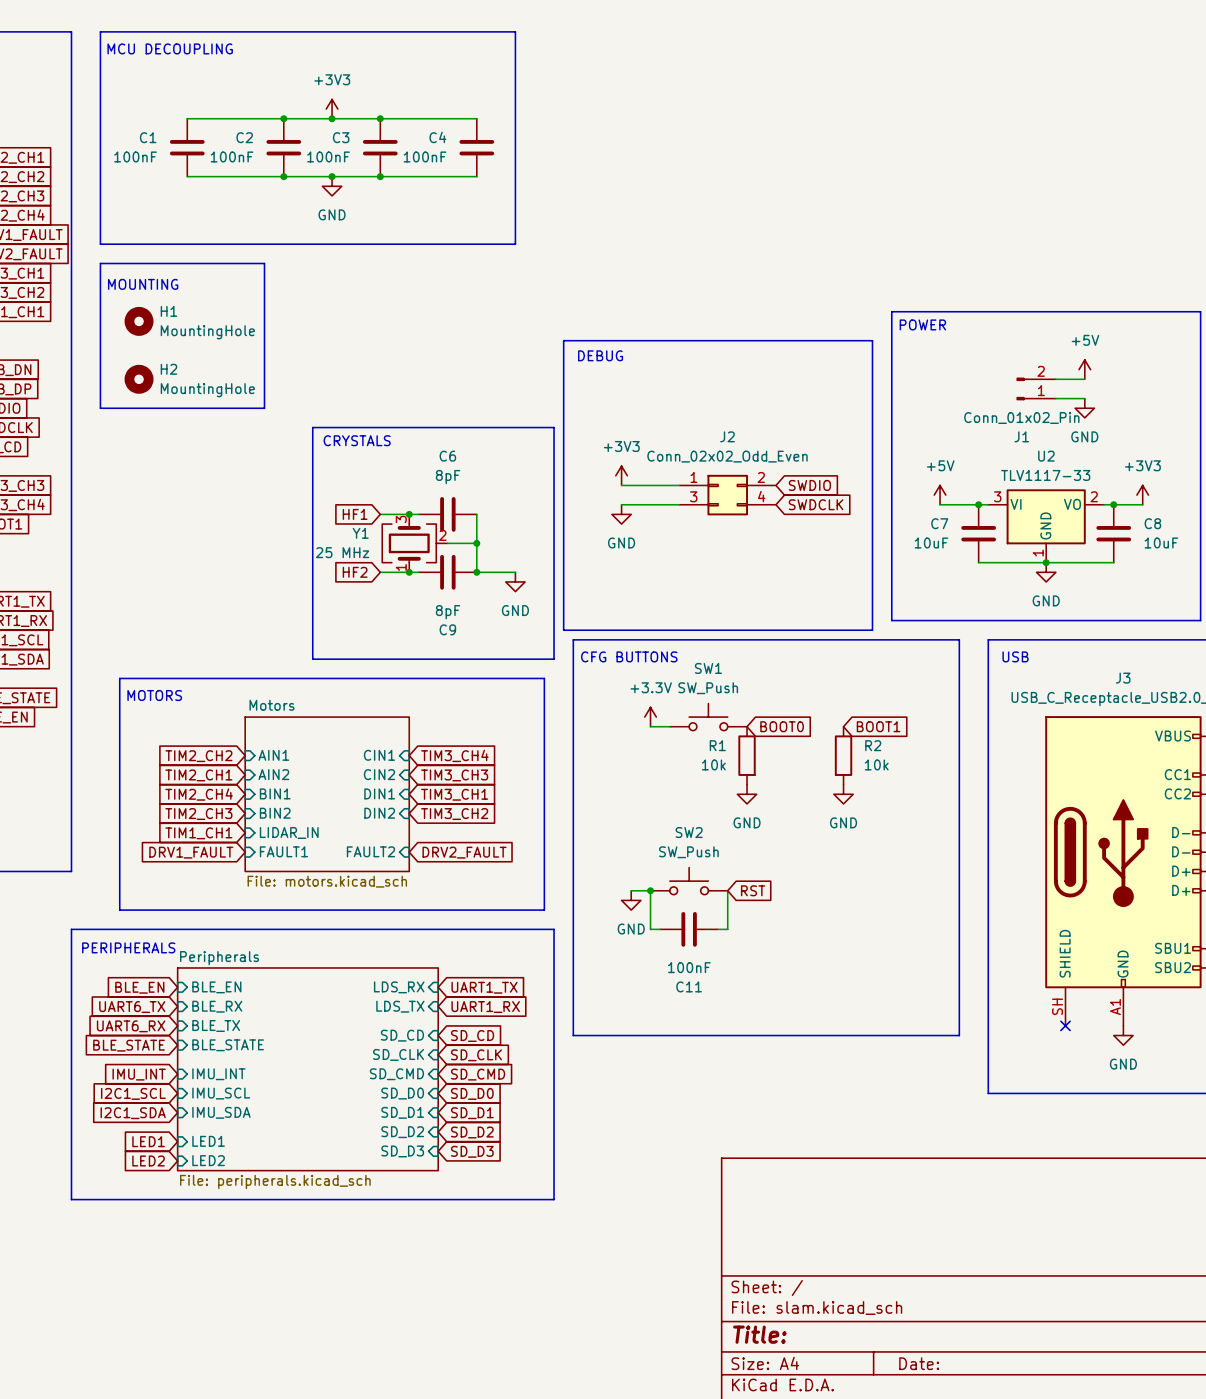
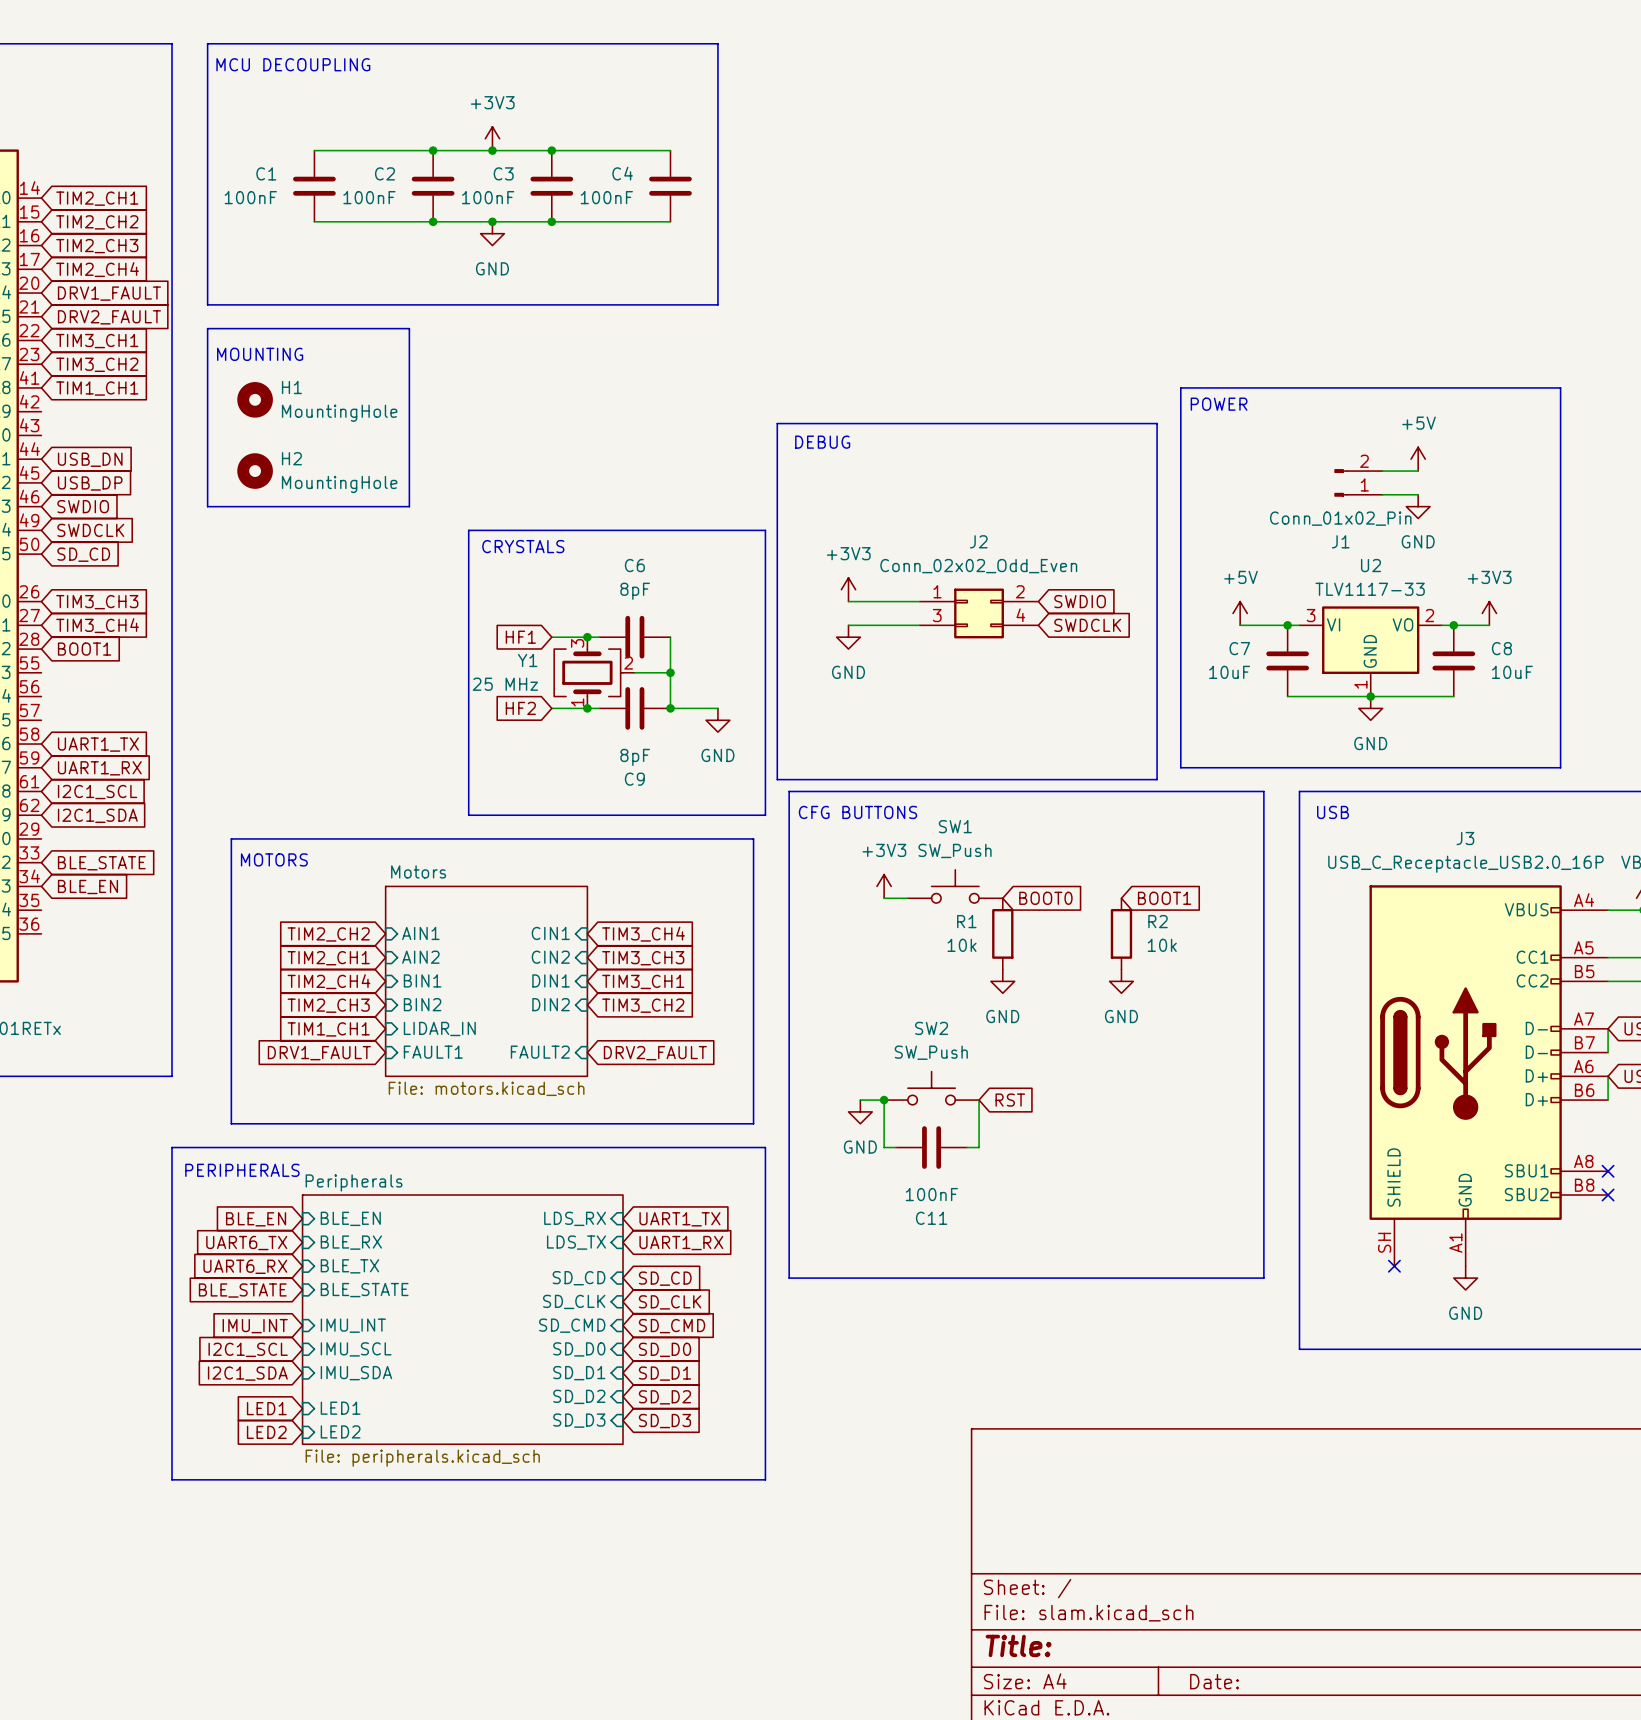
power symbol: +3.3V (650, 717) -> +3V3 (884, 886)

